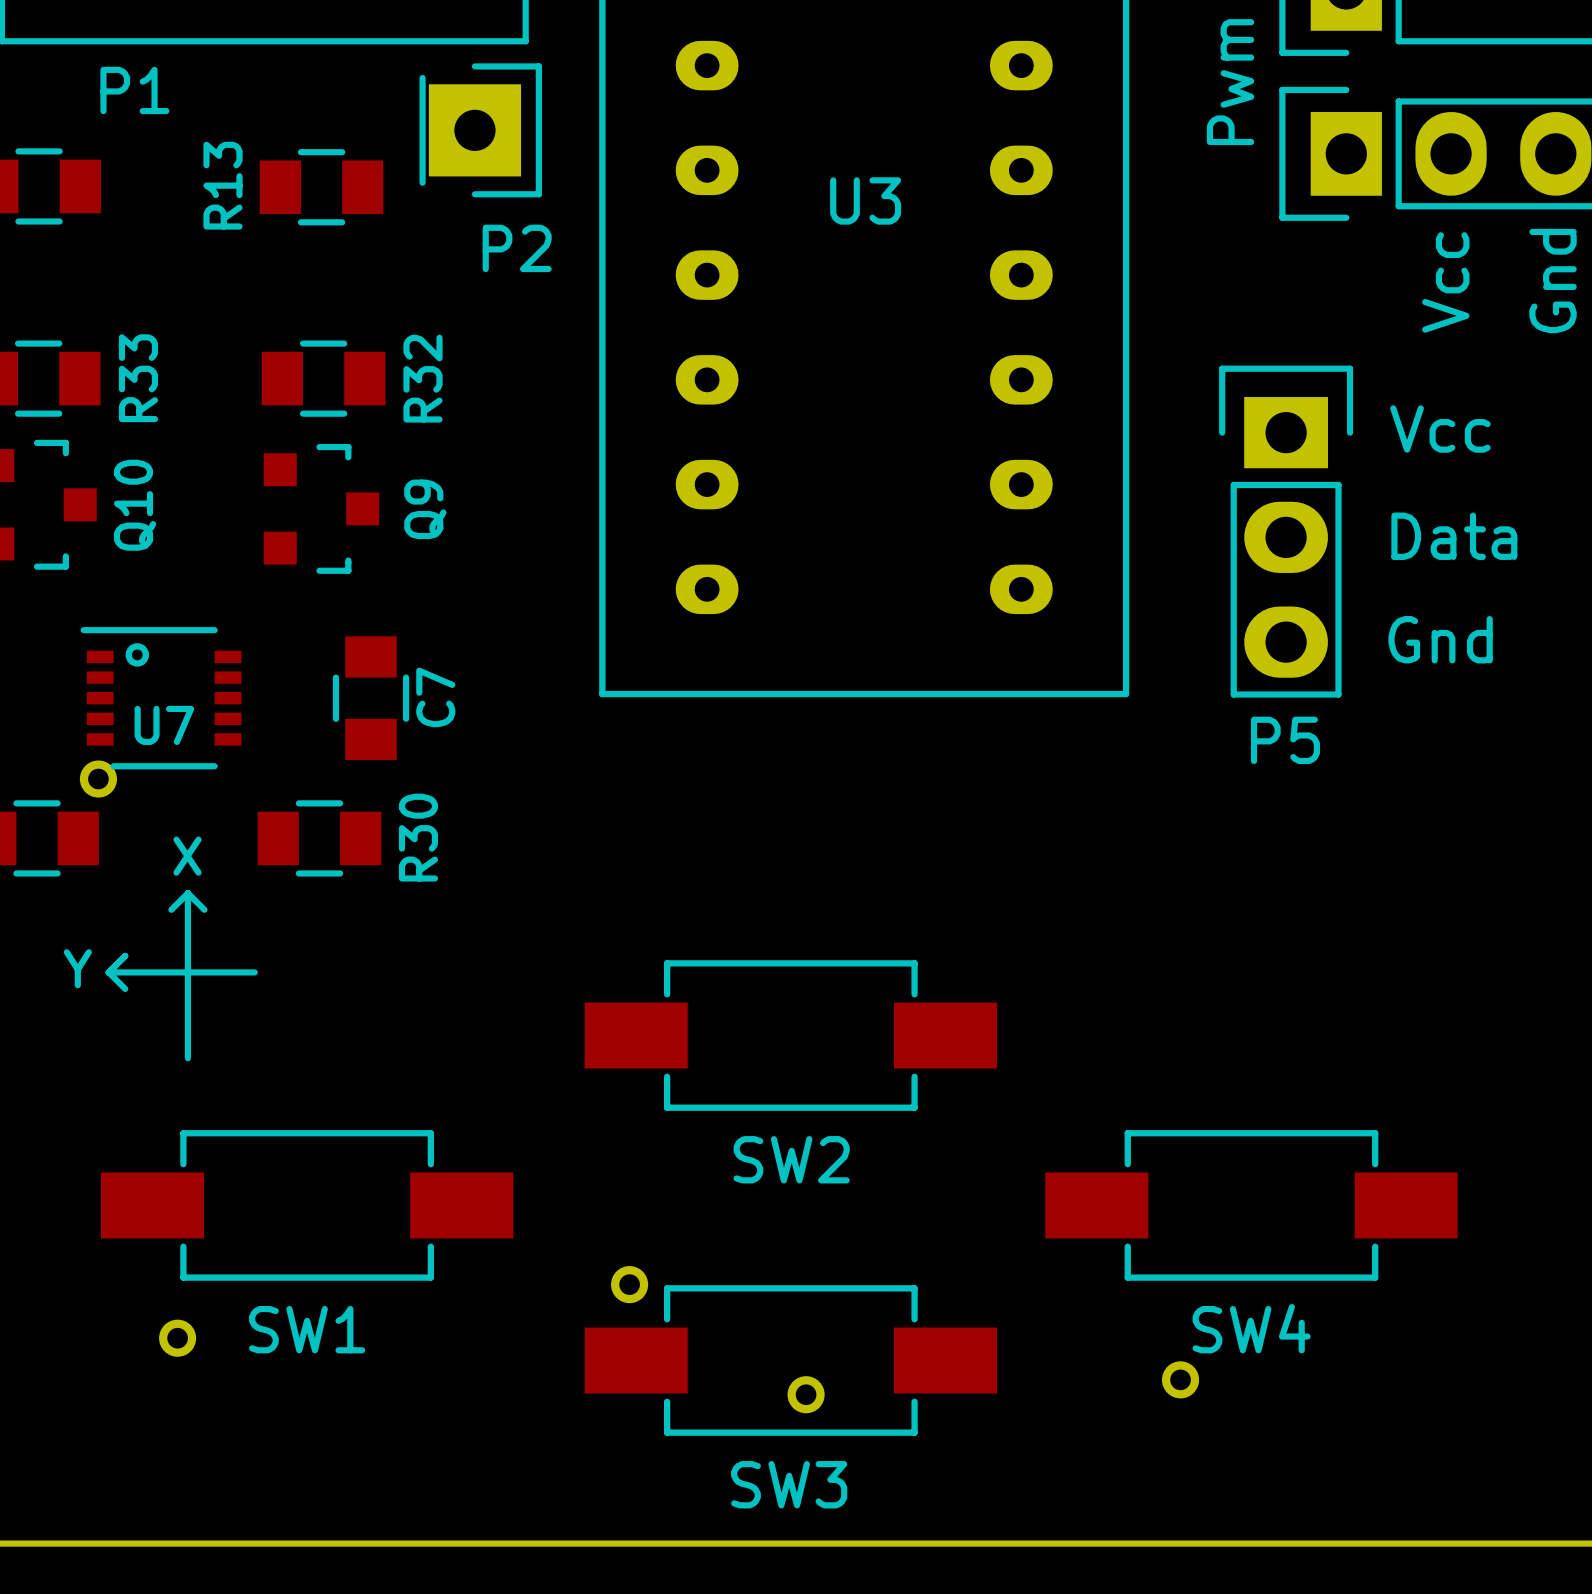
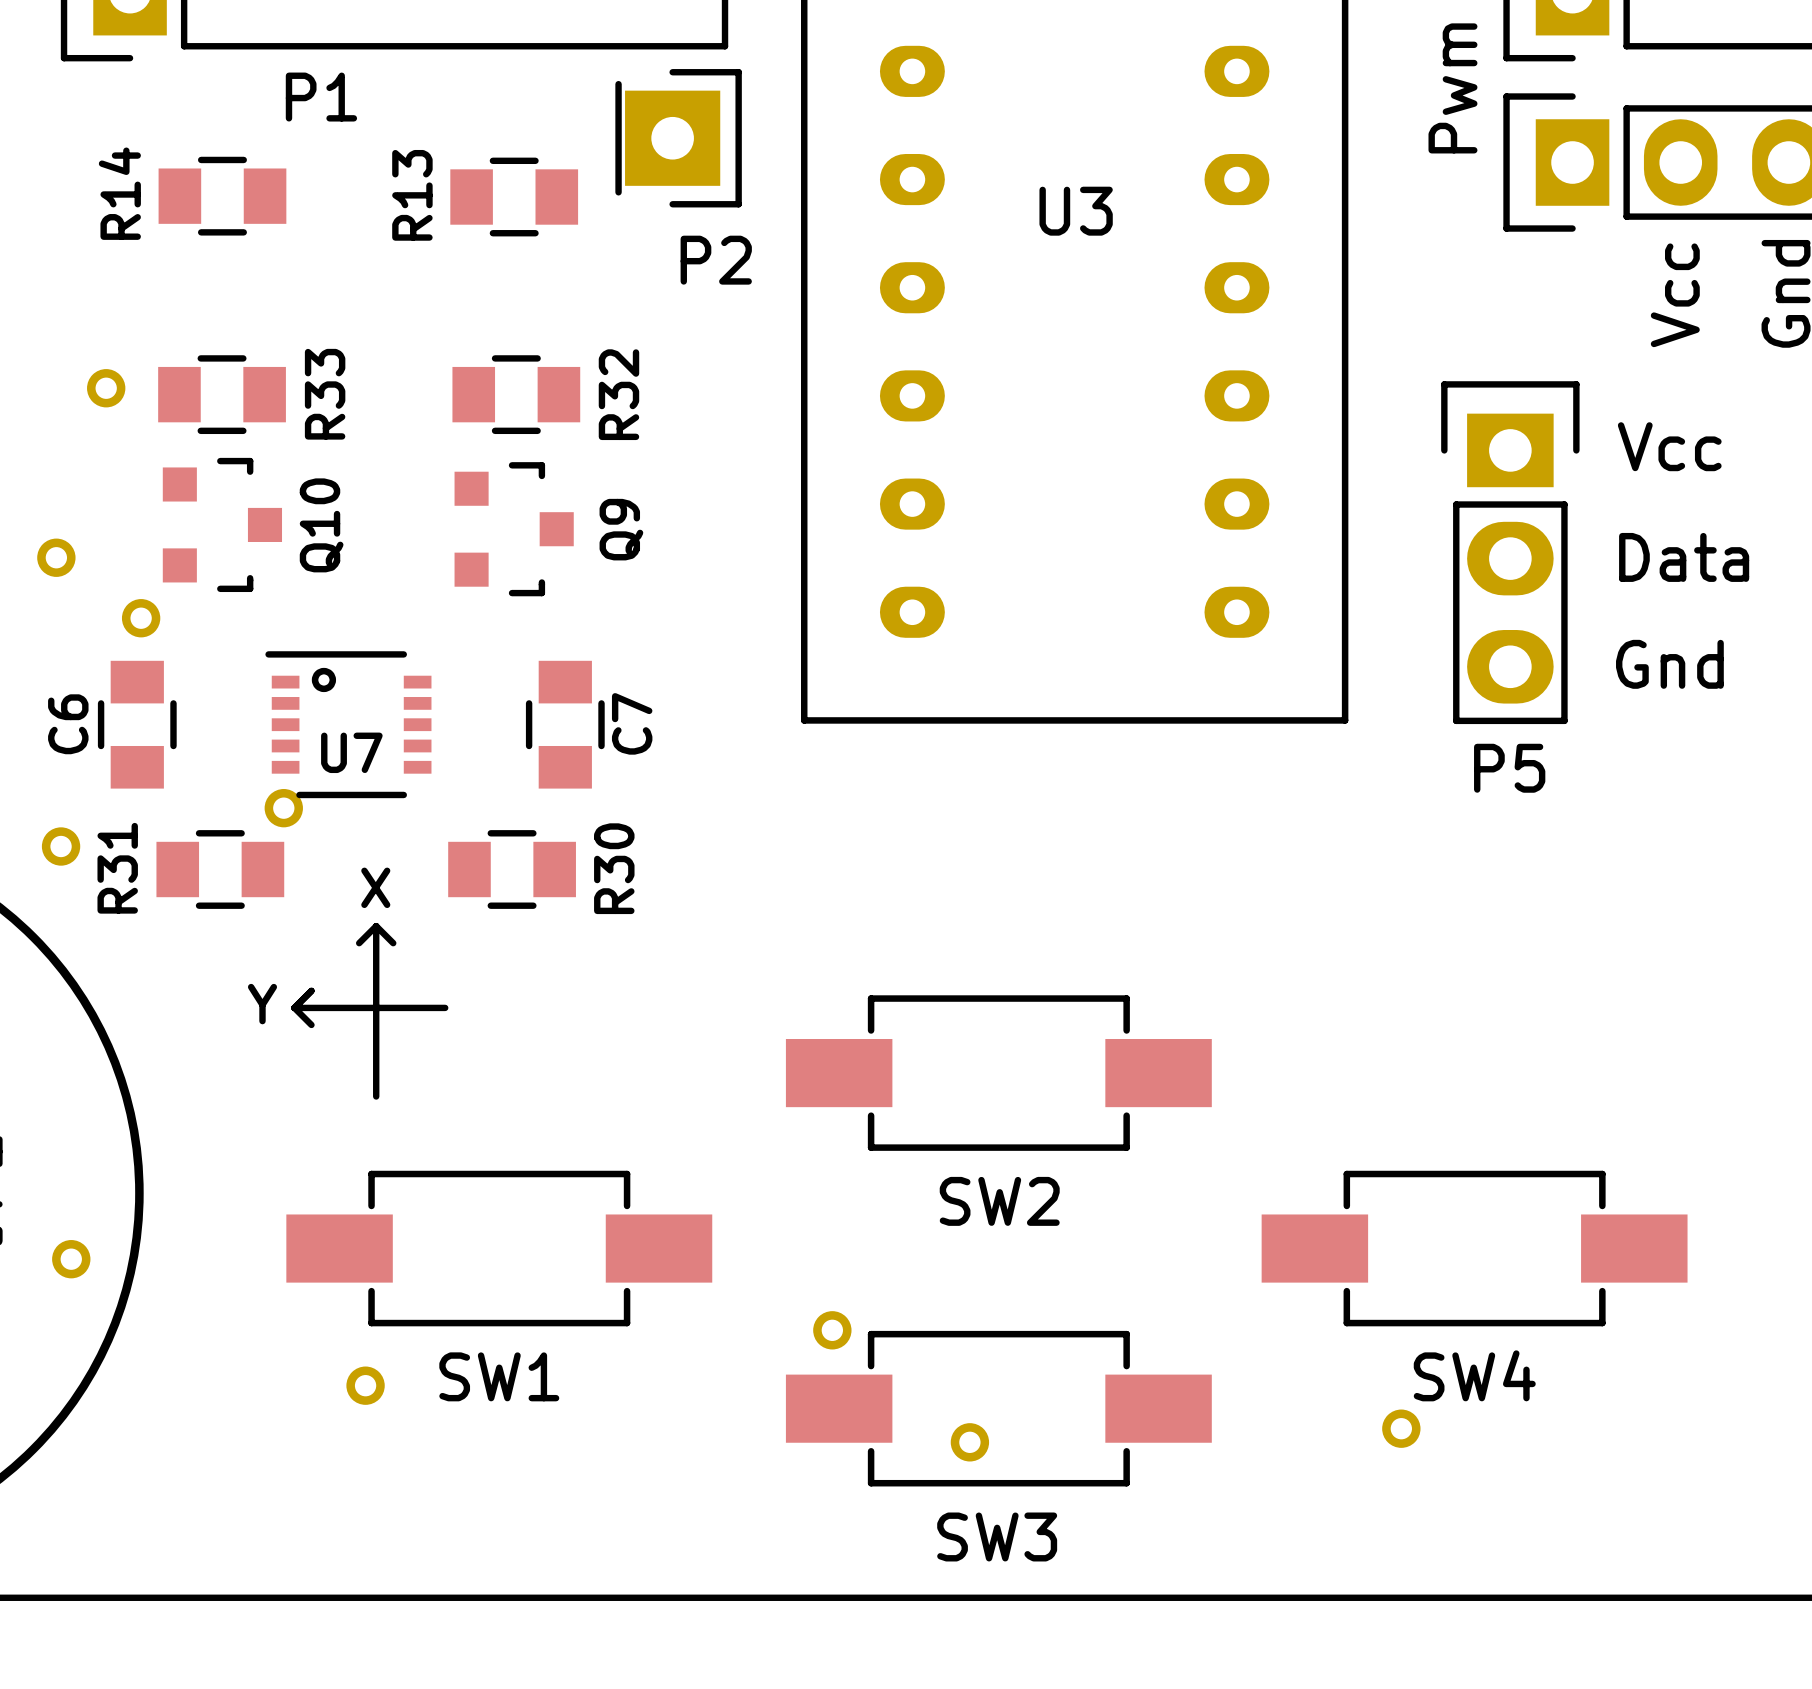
part position: (806, 1394) -> (969, 1442)

